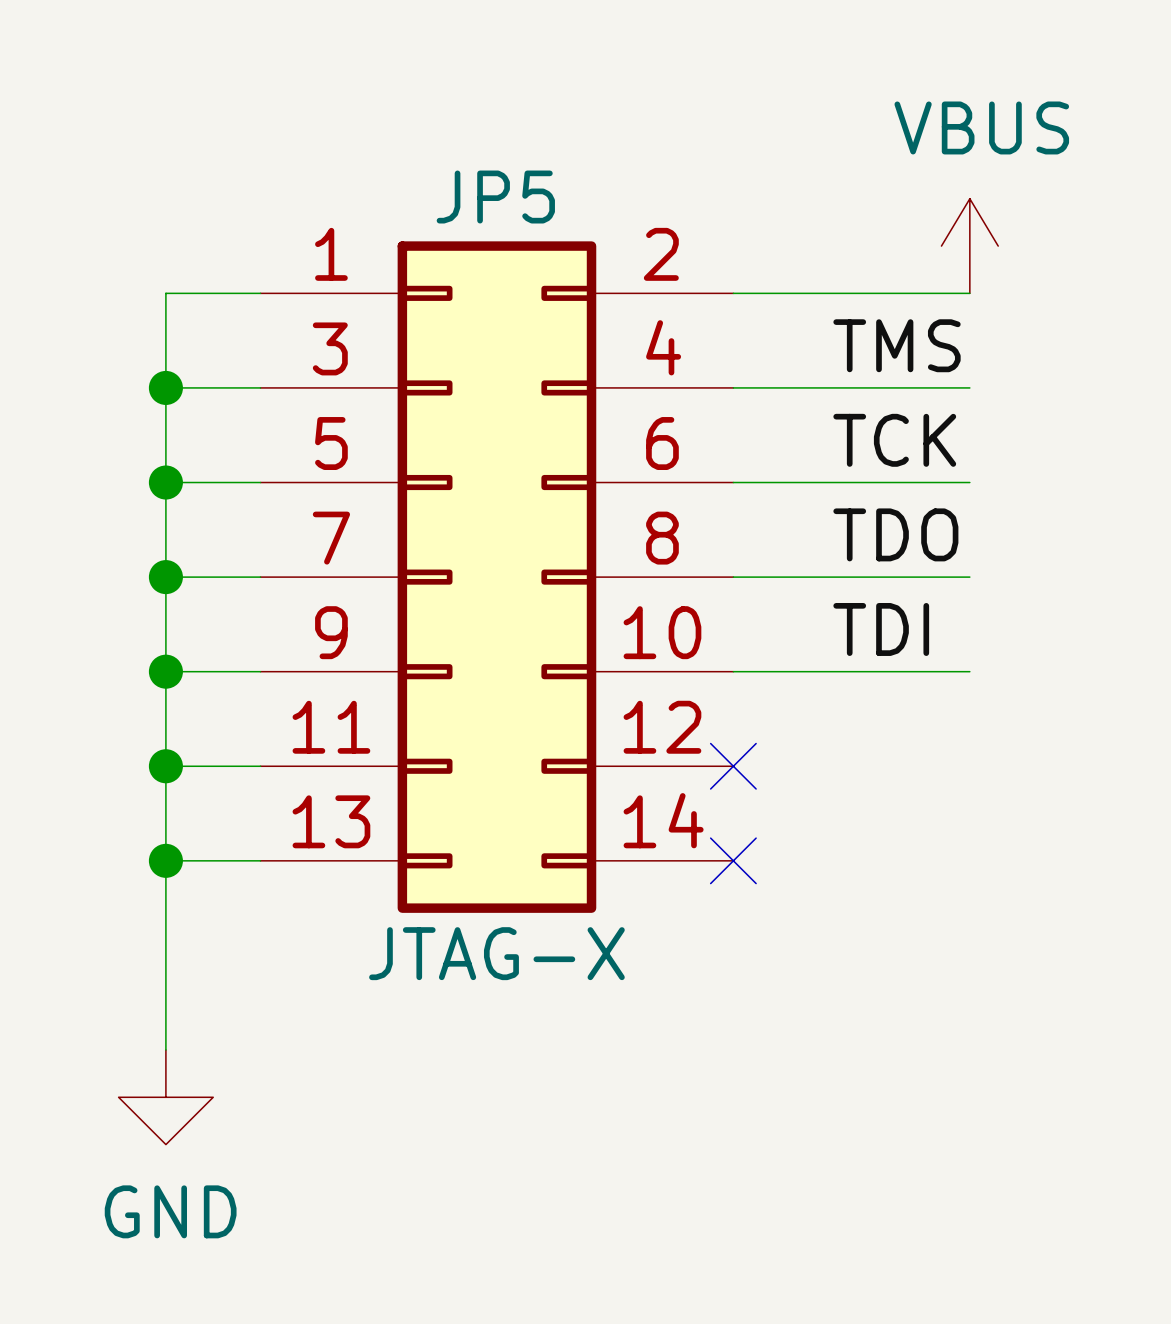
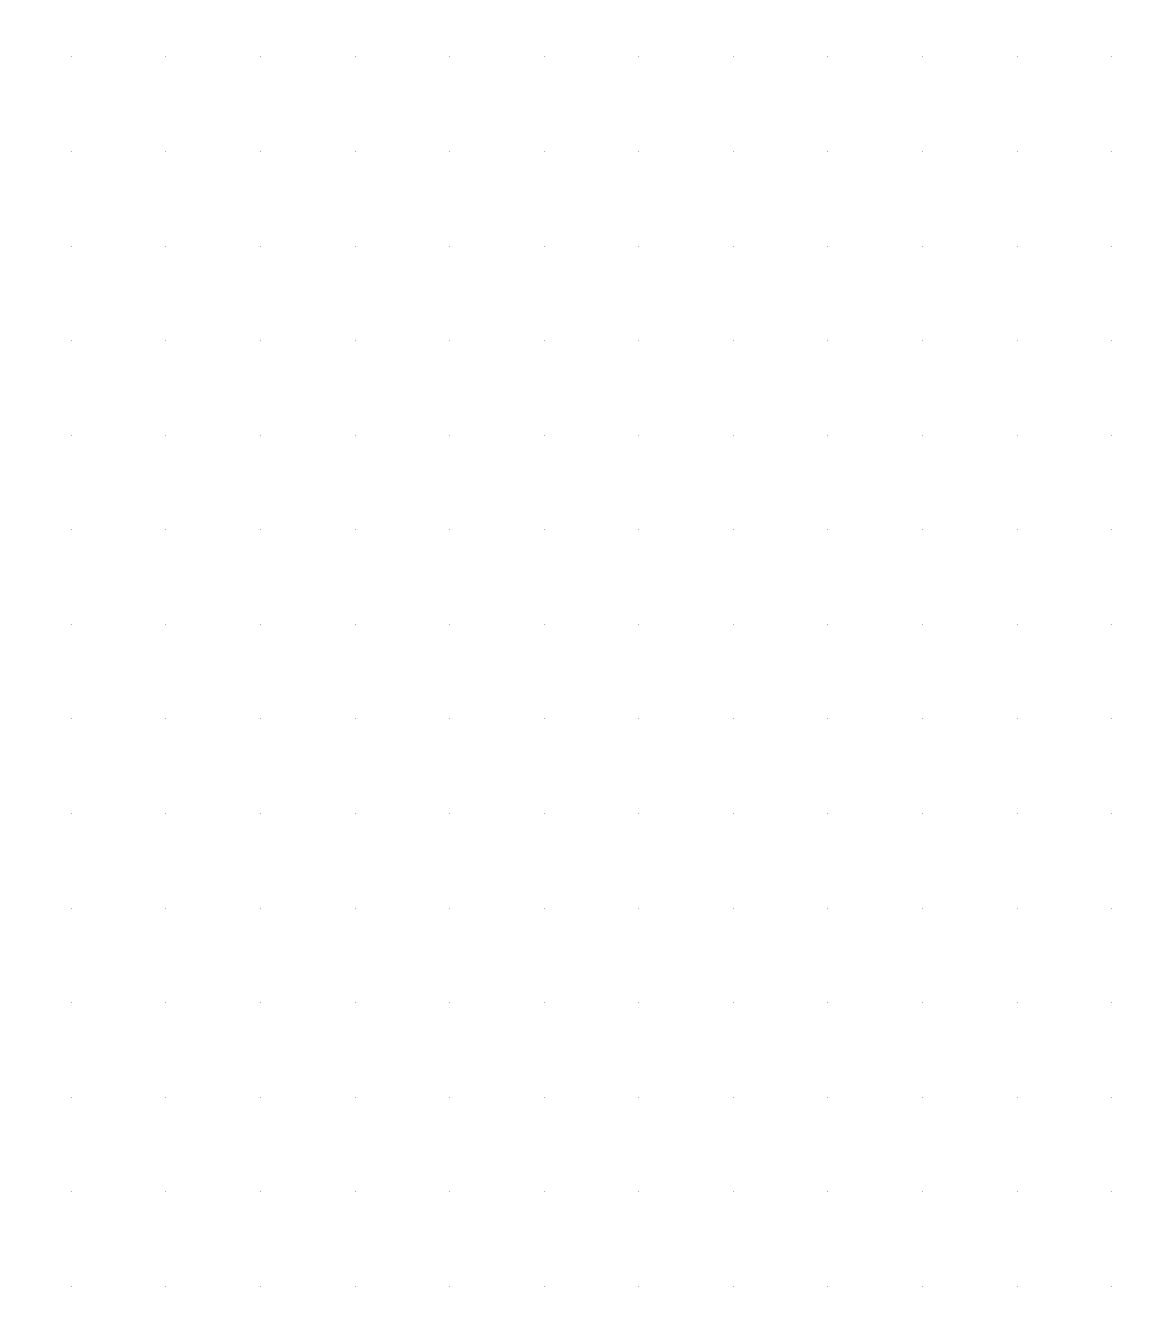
power symbol: VBUS (969, 246) -> none
wire: (260, 293) (165, 293) (165, 1050) -> none
wire: (733, 293) (969, 293) -> none
label: TMS (897, 345) -> none
wire: (165, 387) (260, 387) -> none
junction: (165, 387) -> none
wire: (733, 387) (969, 387) -> none
label: TCK (894, 440) -> none
wire: (165, 482) (260, 482) -> none
junction: (165, 482) -> none
wire: (733, 482) (969, 482) -> none
label: TDO (895, 534) -> none
wire: (165, 577) (260, 577) -> none
junction: (165, 577) -> none
JP5: JTAG-X (496, 577) -> none
wire: (733, 577) (969, 577) -> none
label: TDI (881, 629) -> none
wire: (165, 671) (260, 671) -> none
junction: (165, 671) -> none
wire: (733, 671) (969, 671) -> none
wire: (165, 766) (260, 766) -> none
junction: (165, 766) -> none
no-connect mark: (733, 766) -> none
wire: (165, 860) (260, 860) -> none
junction: (165, 860) -> none
no-connect mark: (733, 860) -> none
power symbol: GND (165, 1097) -> none

